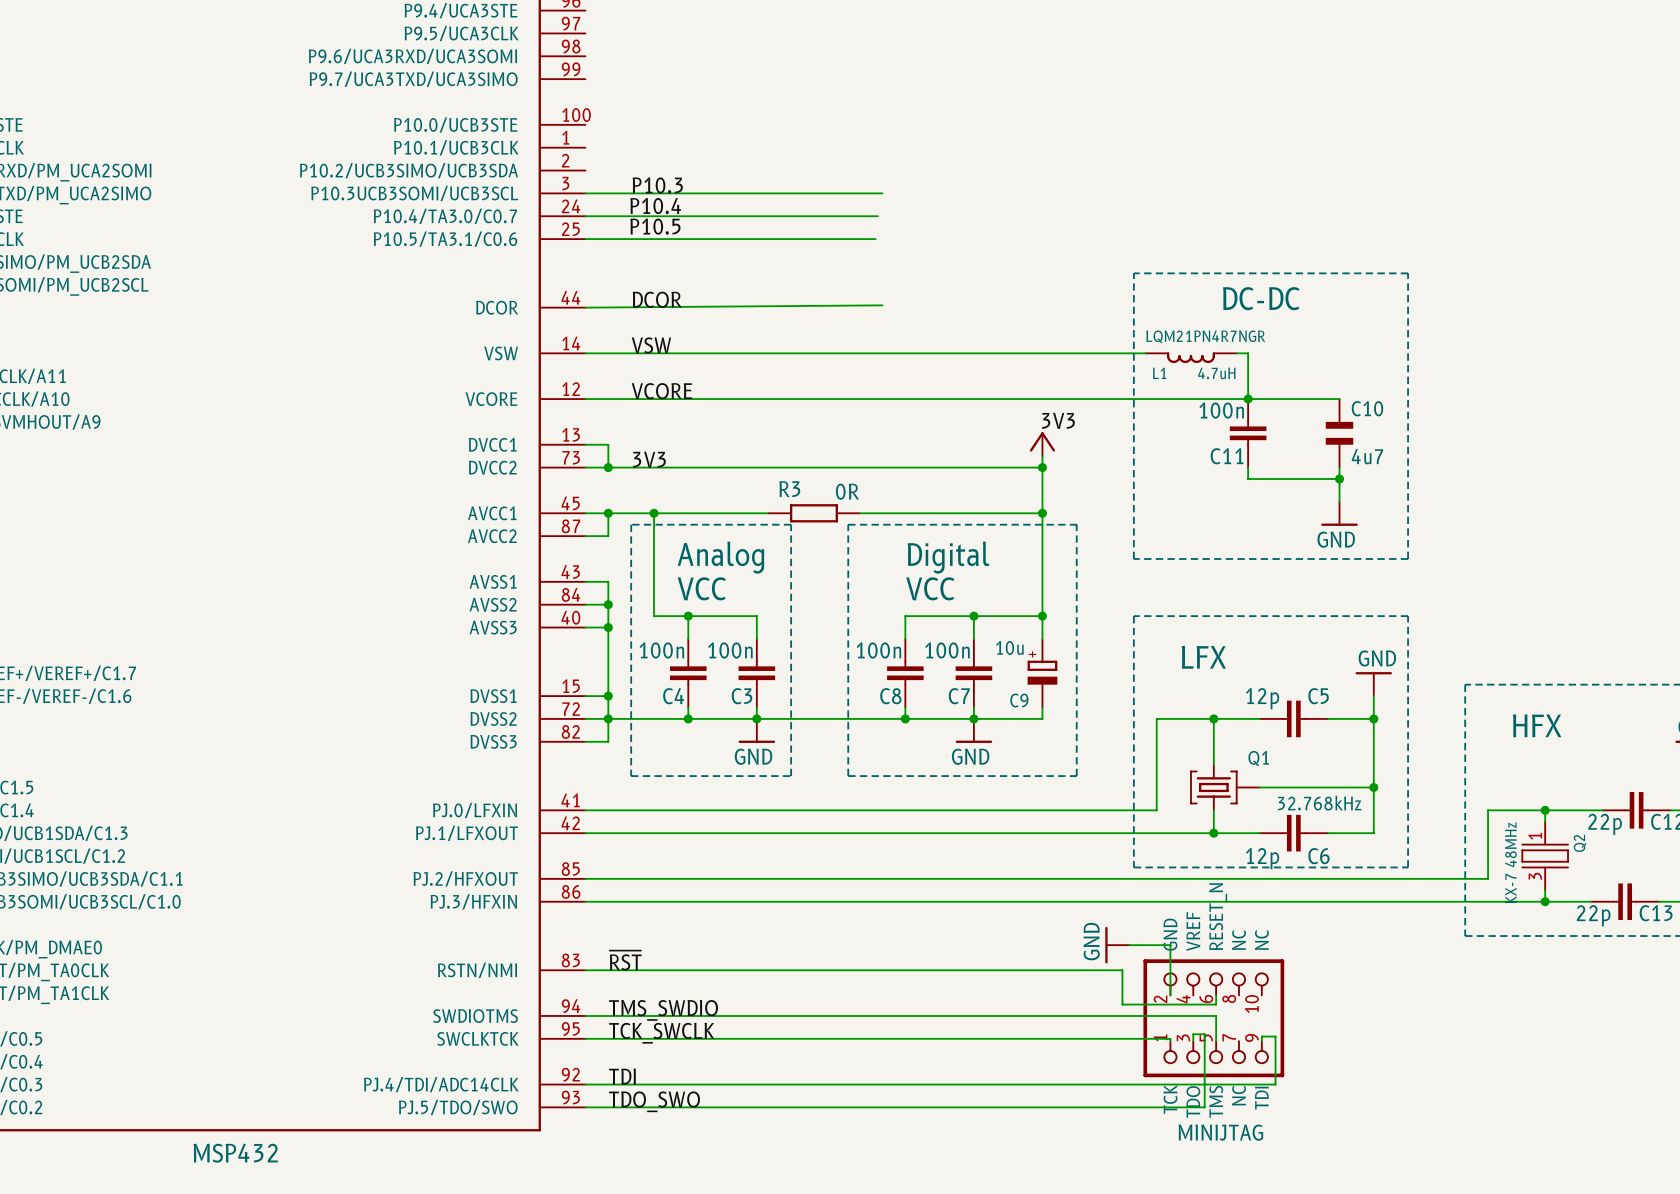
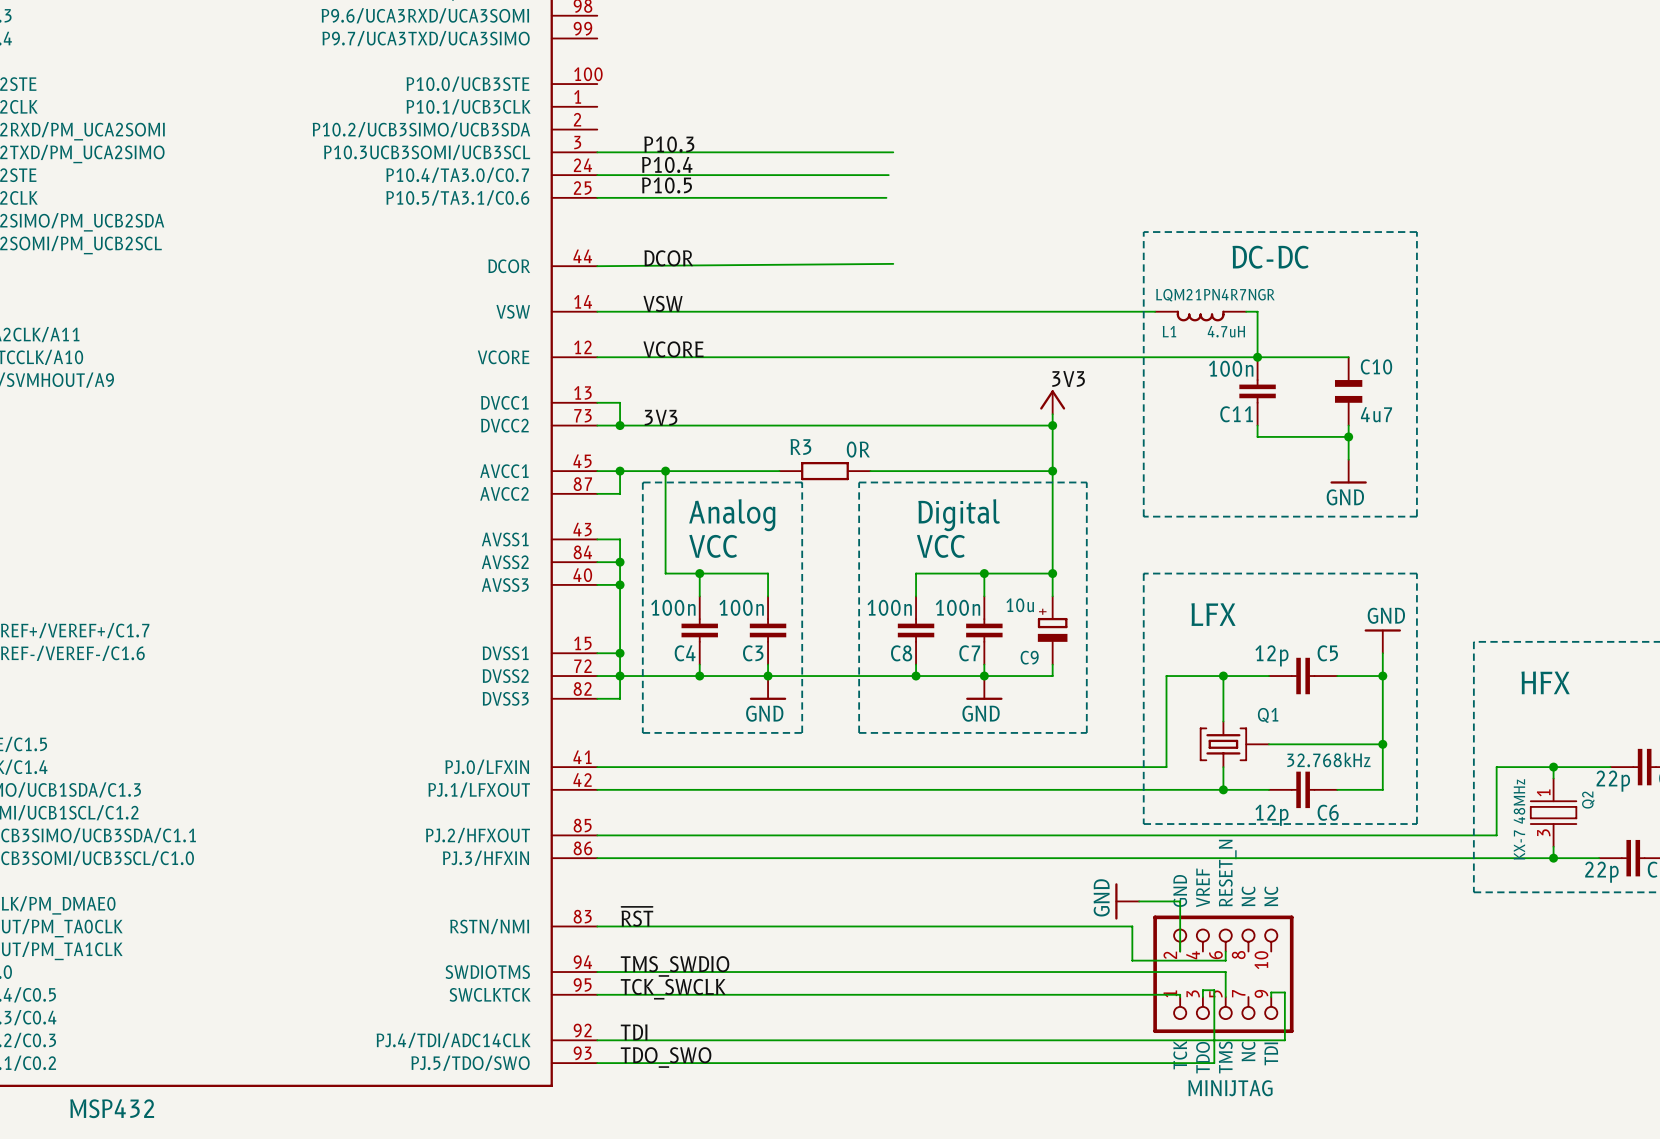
part value position: MSP432 (235, 1153) -> MSP432 (112, 1108)

